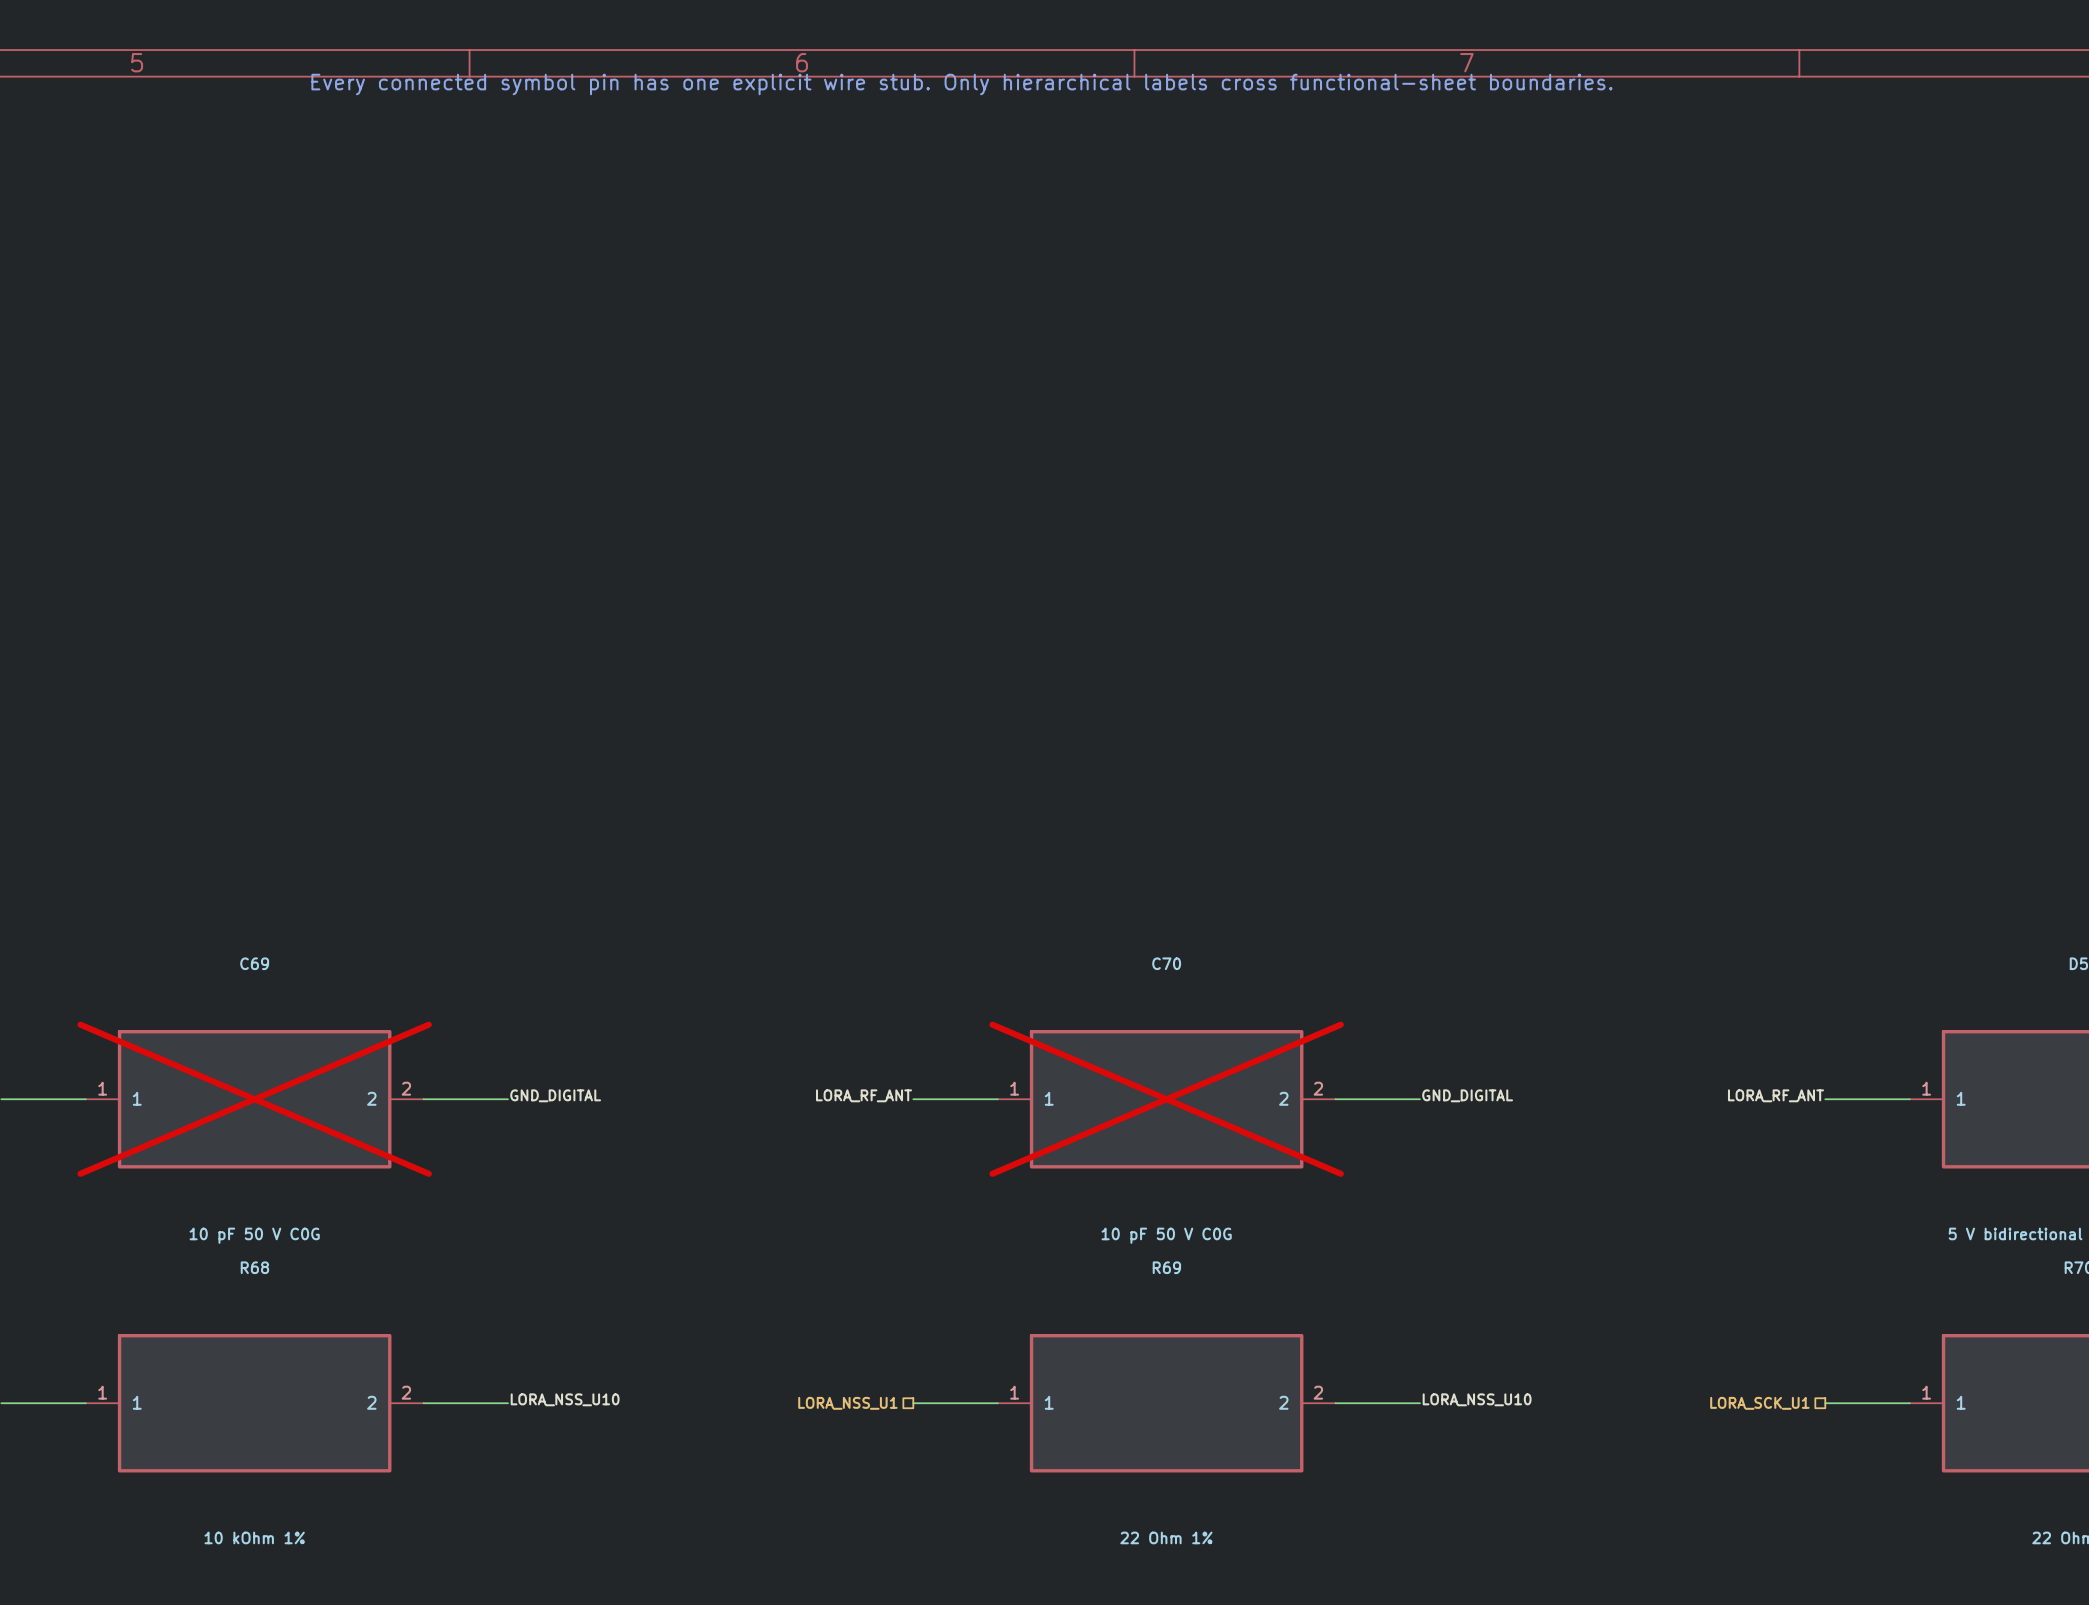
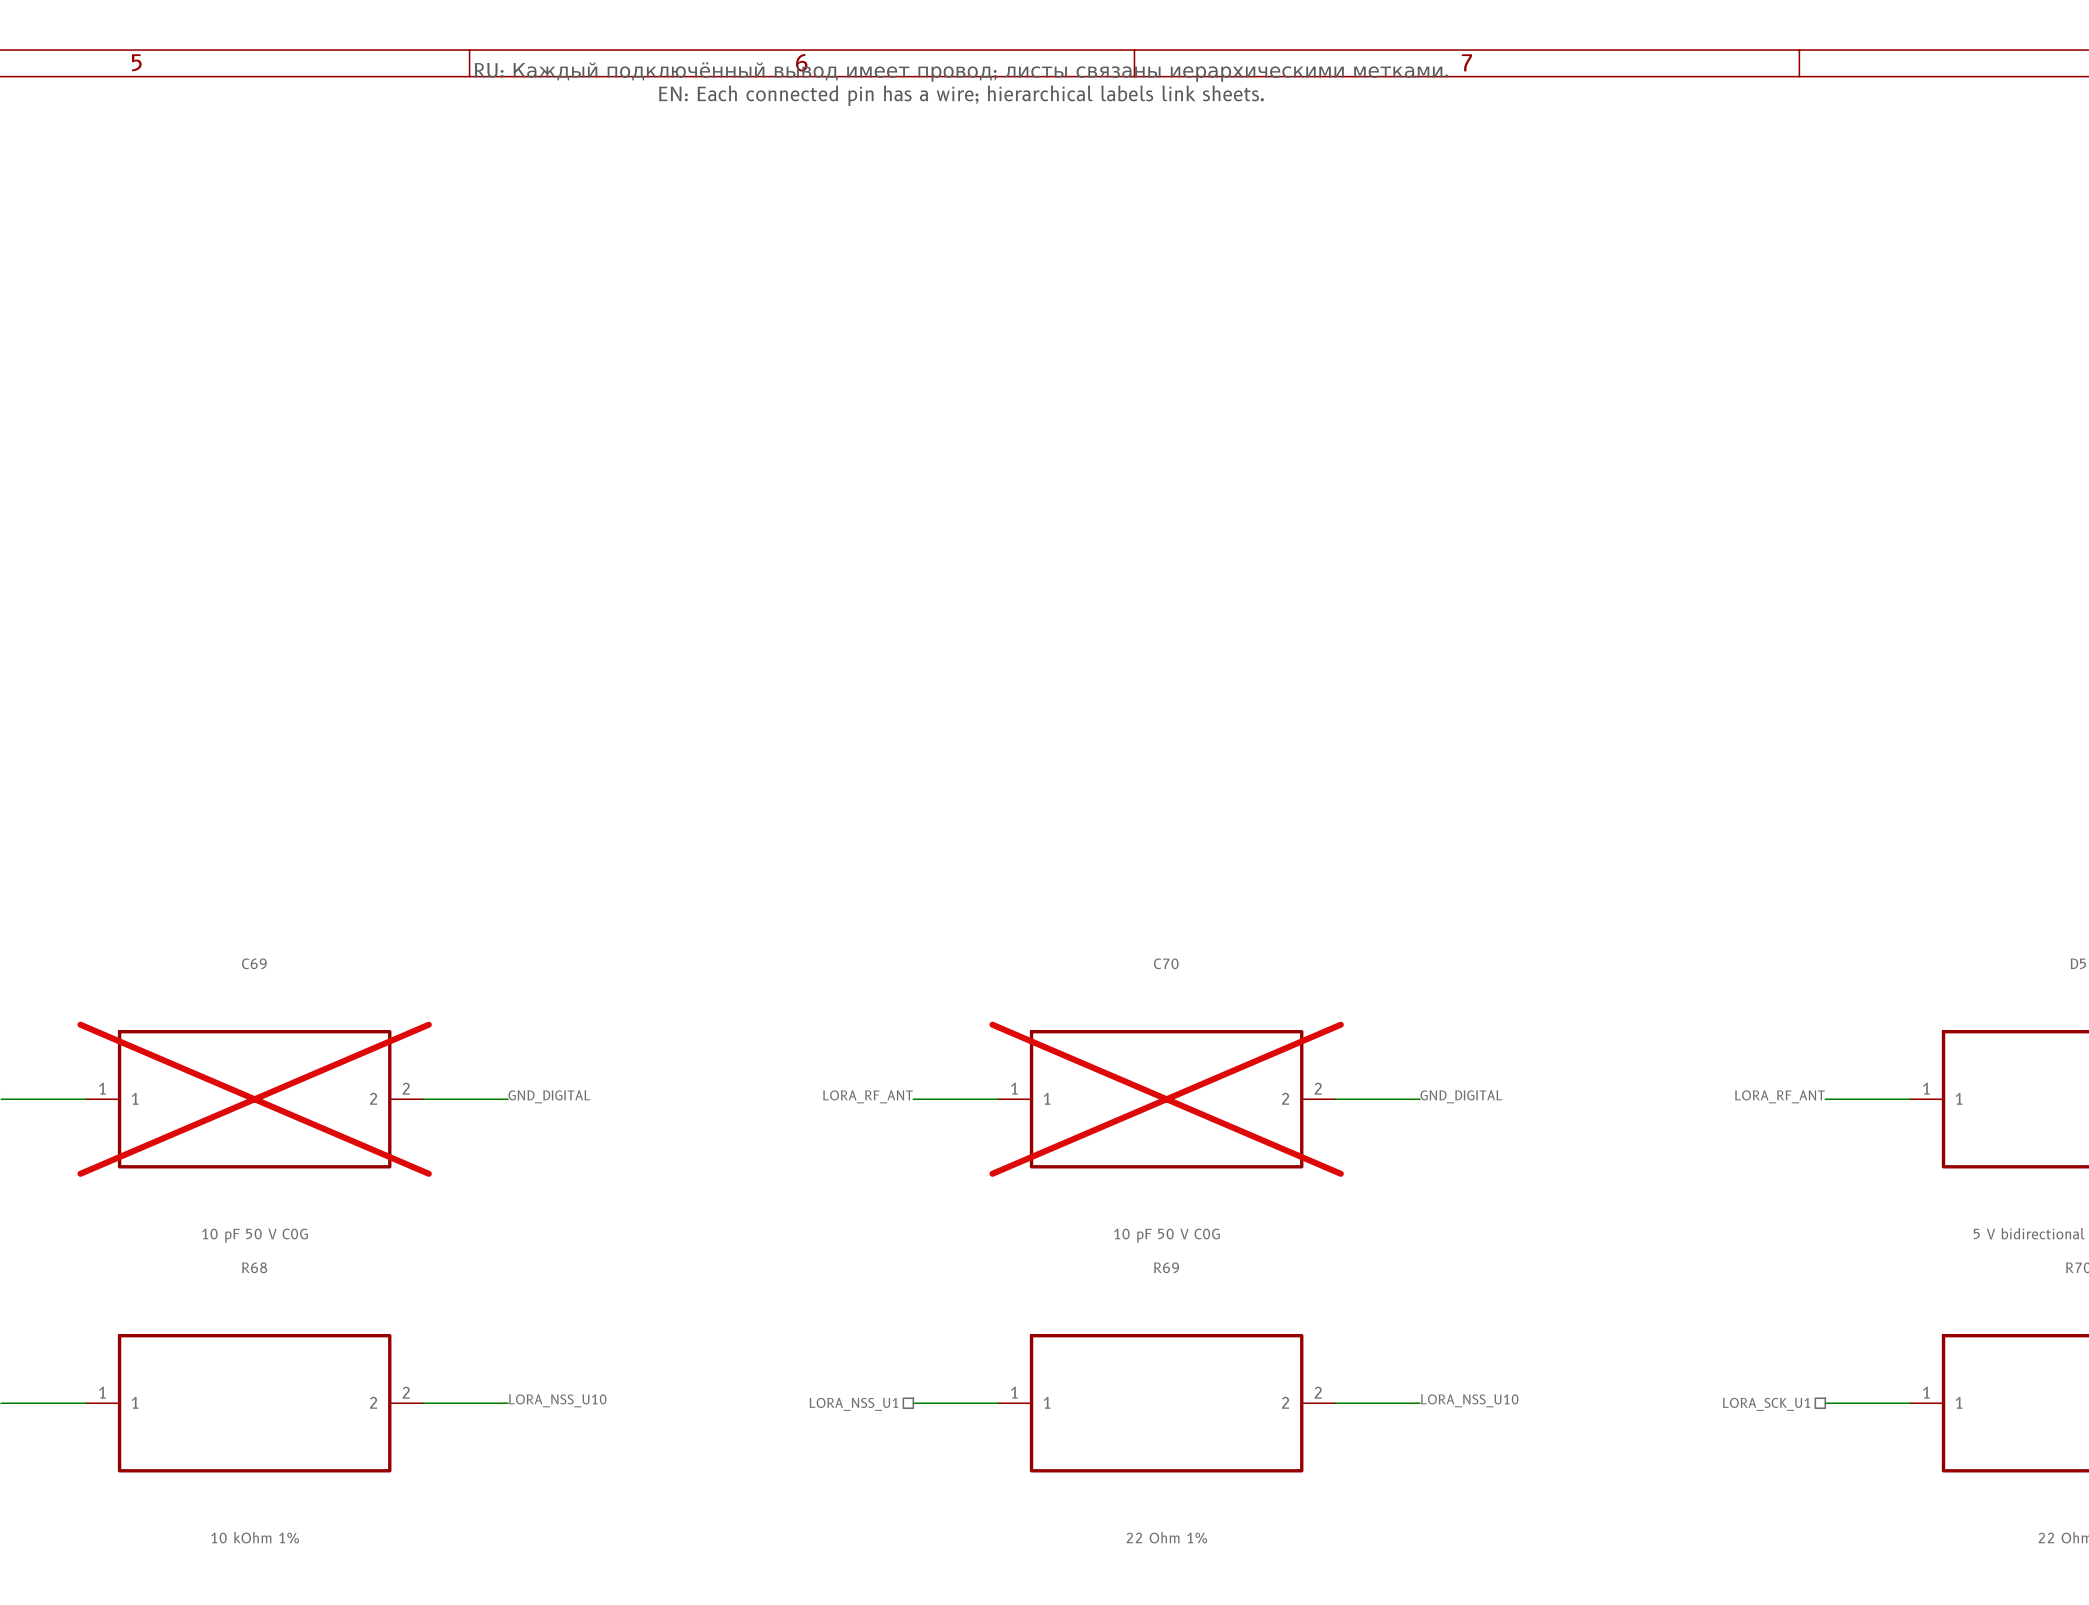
text: none -> RU: Каждый подключённый вывод имеет провод; листы связаны иерархическими метками. (961, 72)
text: Every connected symbol pin has one explicit wire stub. Only hierarchical labels cross functional-sheet boundaries. (961, 84) -> none
text: none -> EN: Each connected pin has a wire; hierarchical labels link sheets. (961, 95)

